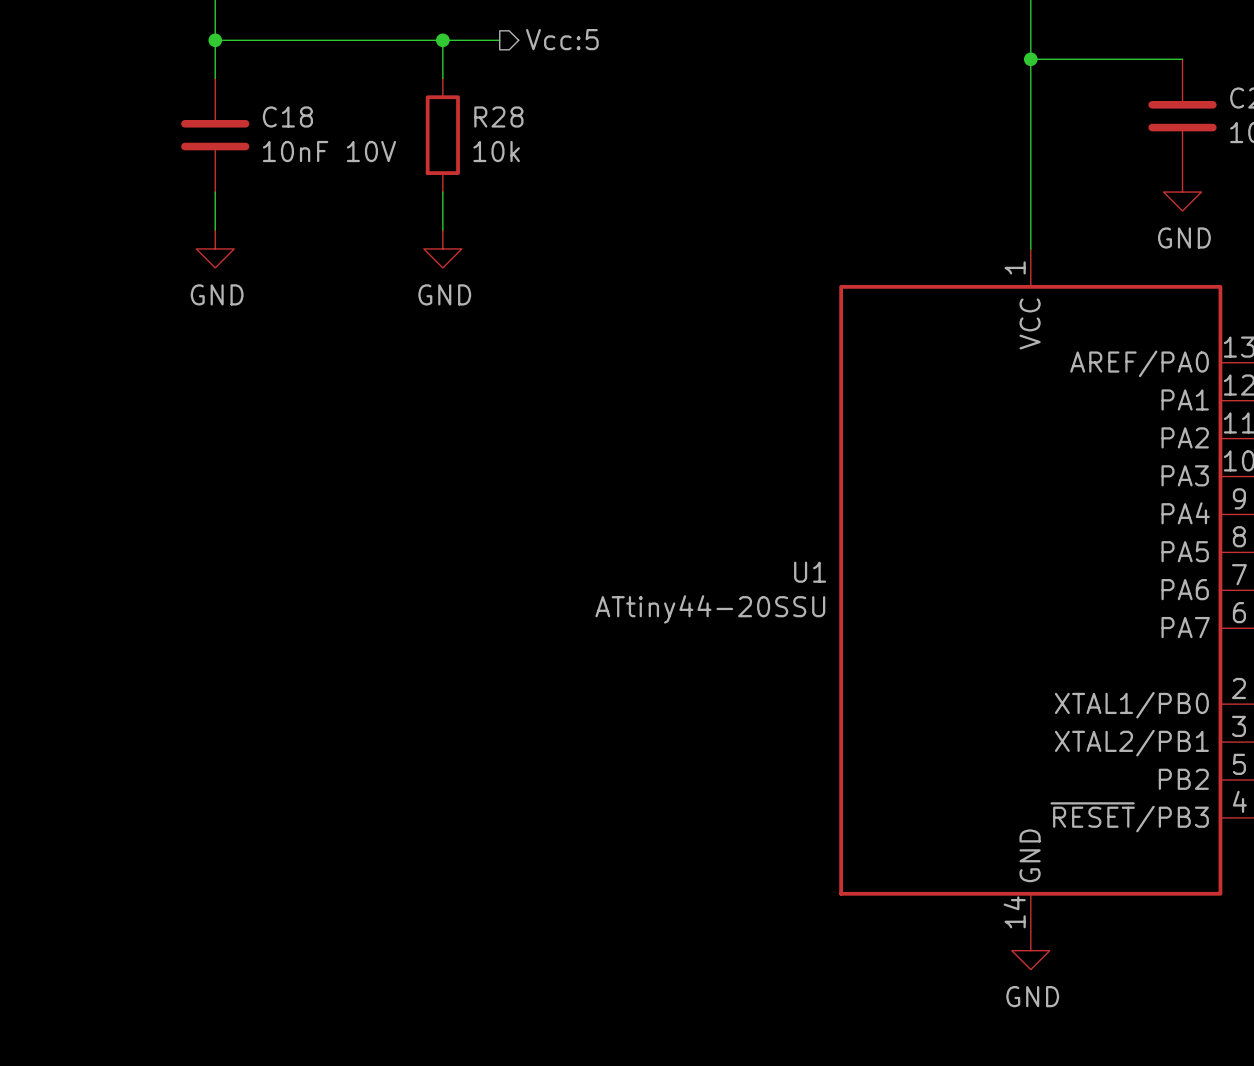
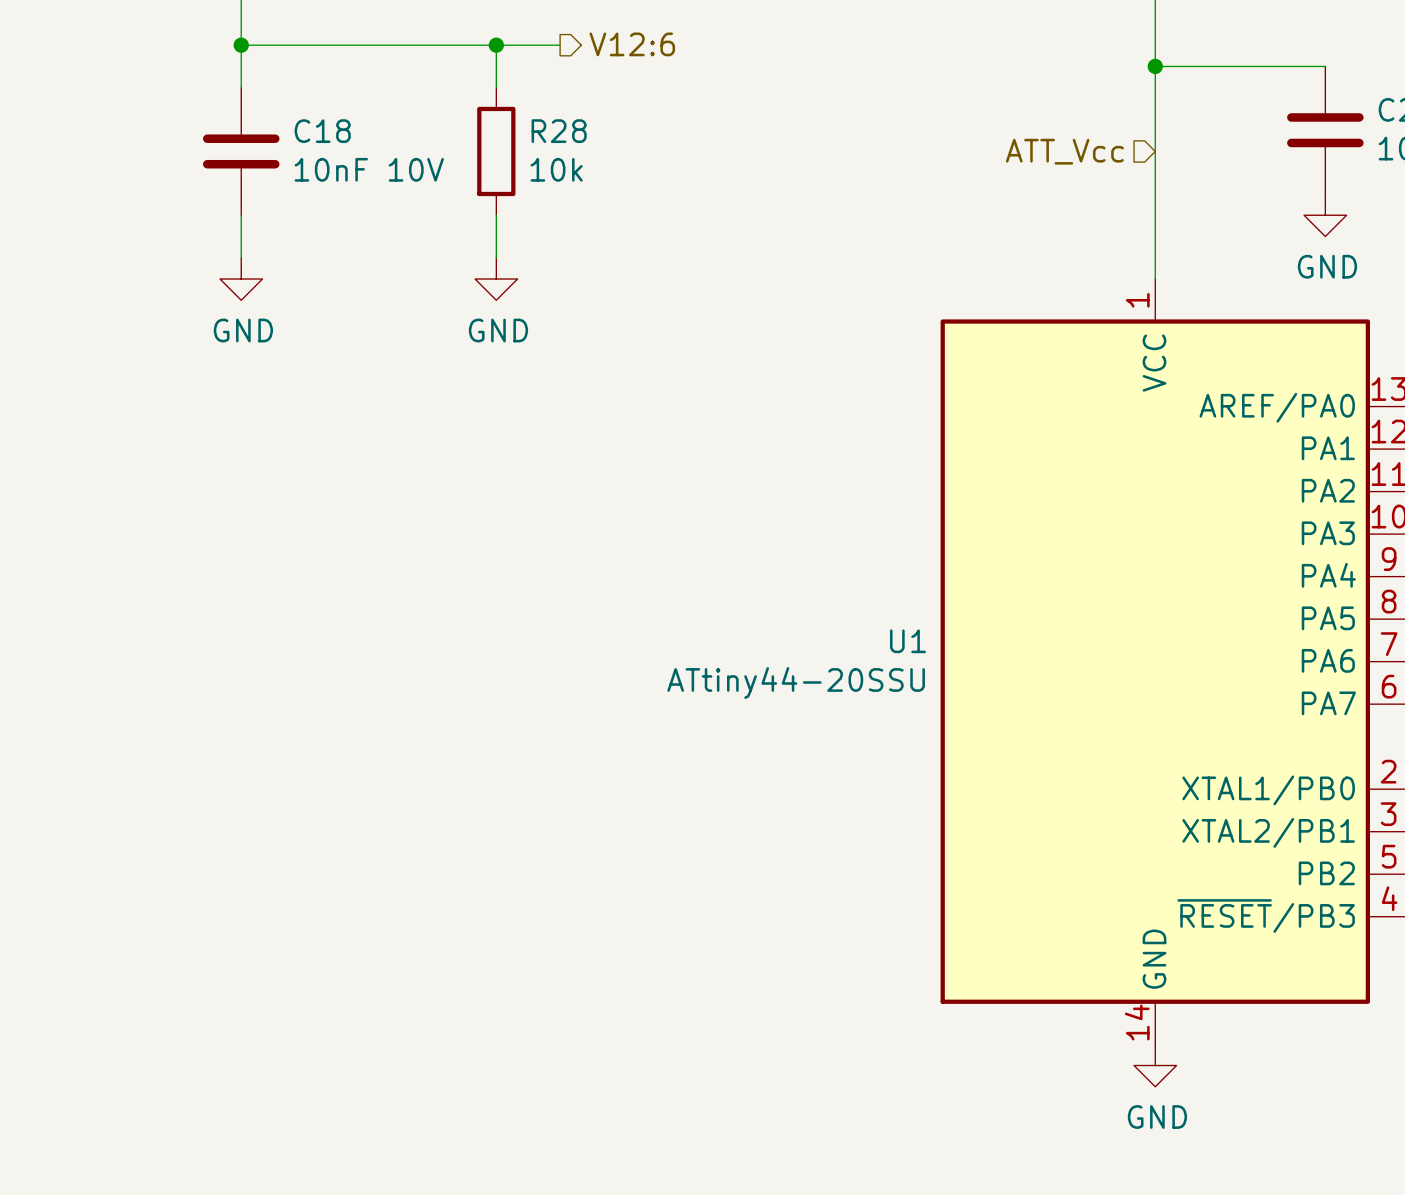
hierarchical label: Vcc:5 (562, 39) -> V12:6 (632, 44)
hierarchical label: none -> ATT_Vcc (1064, 151)

